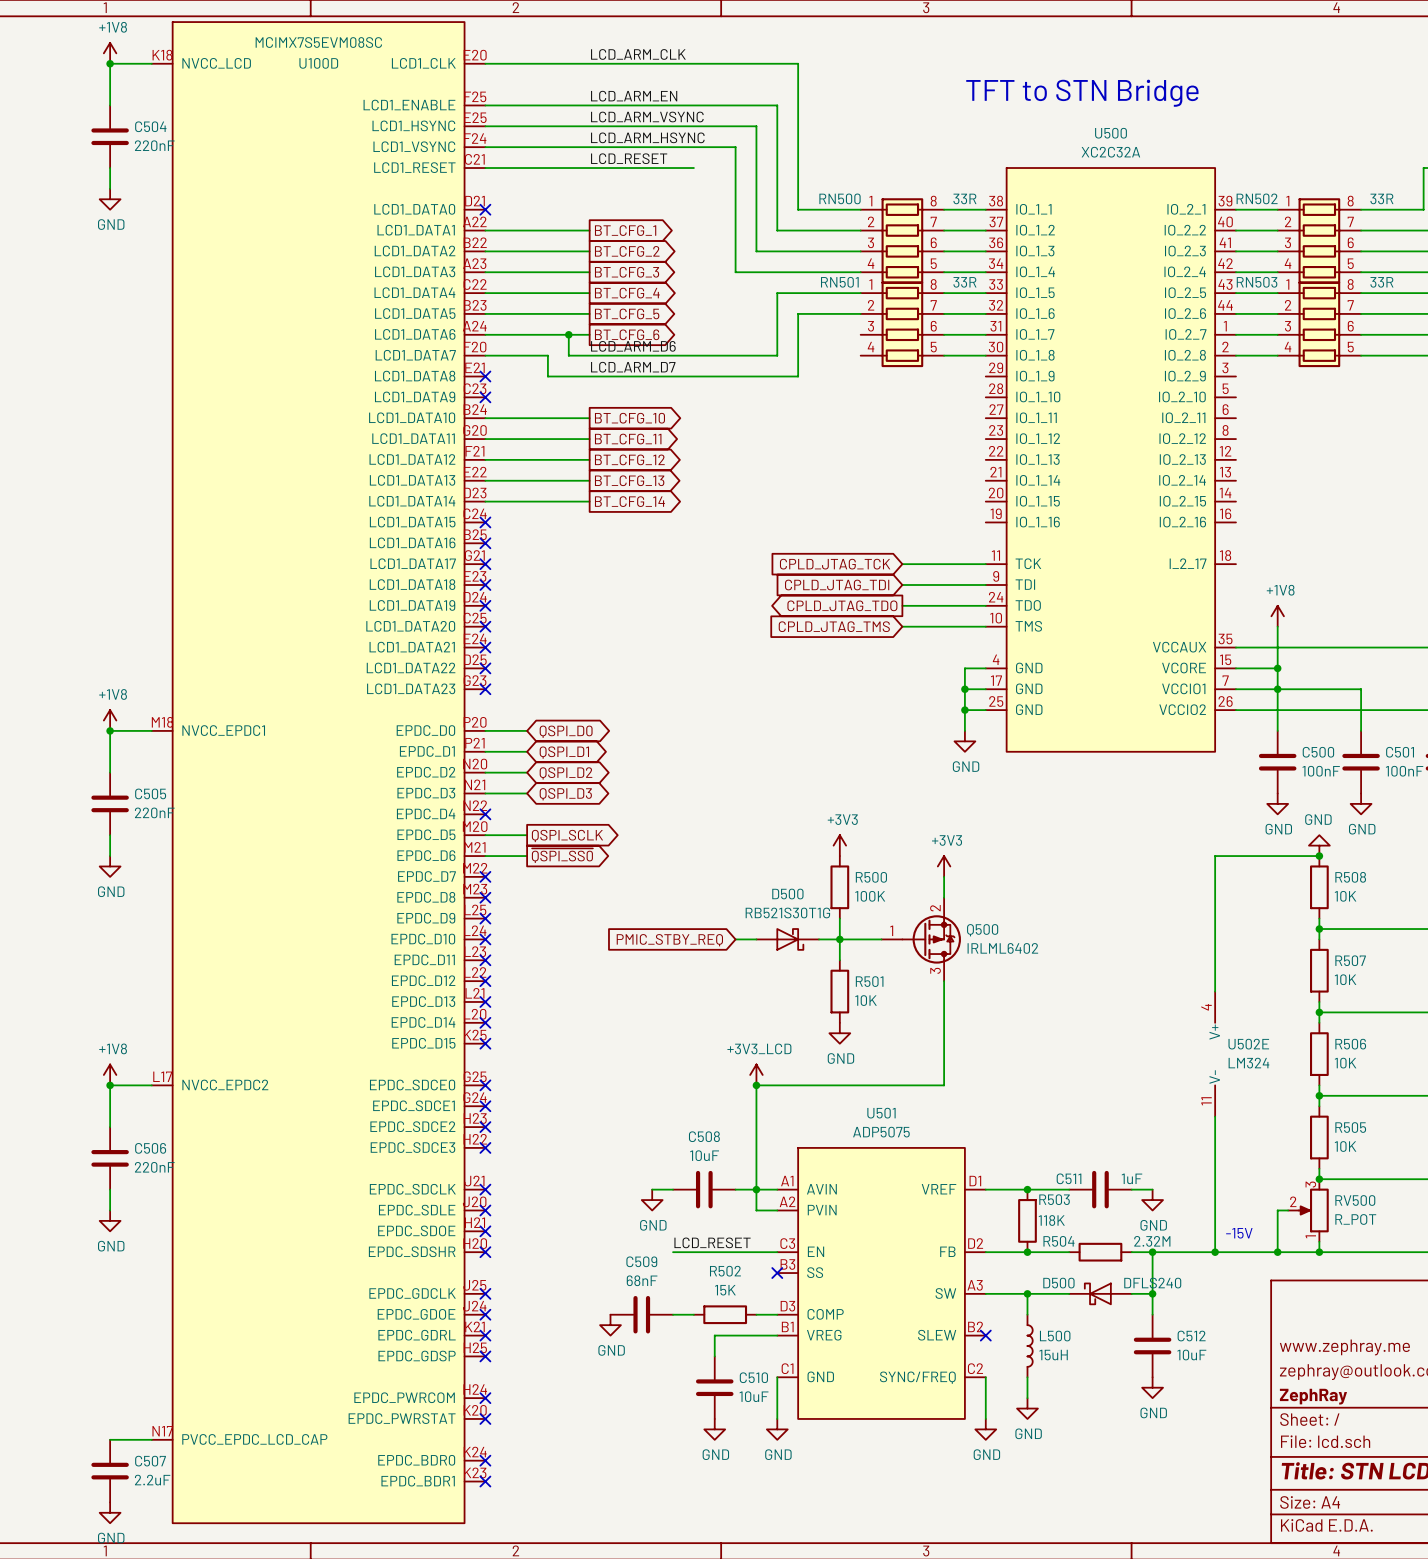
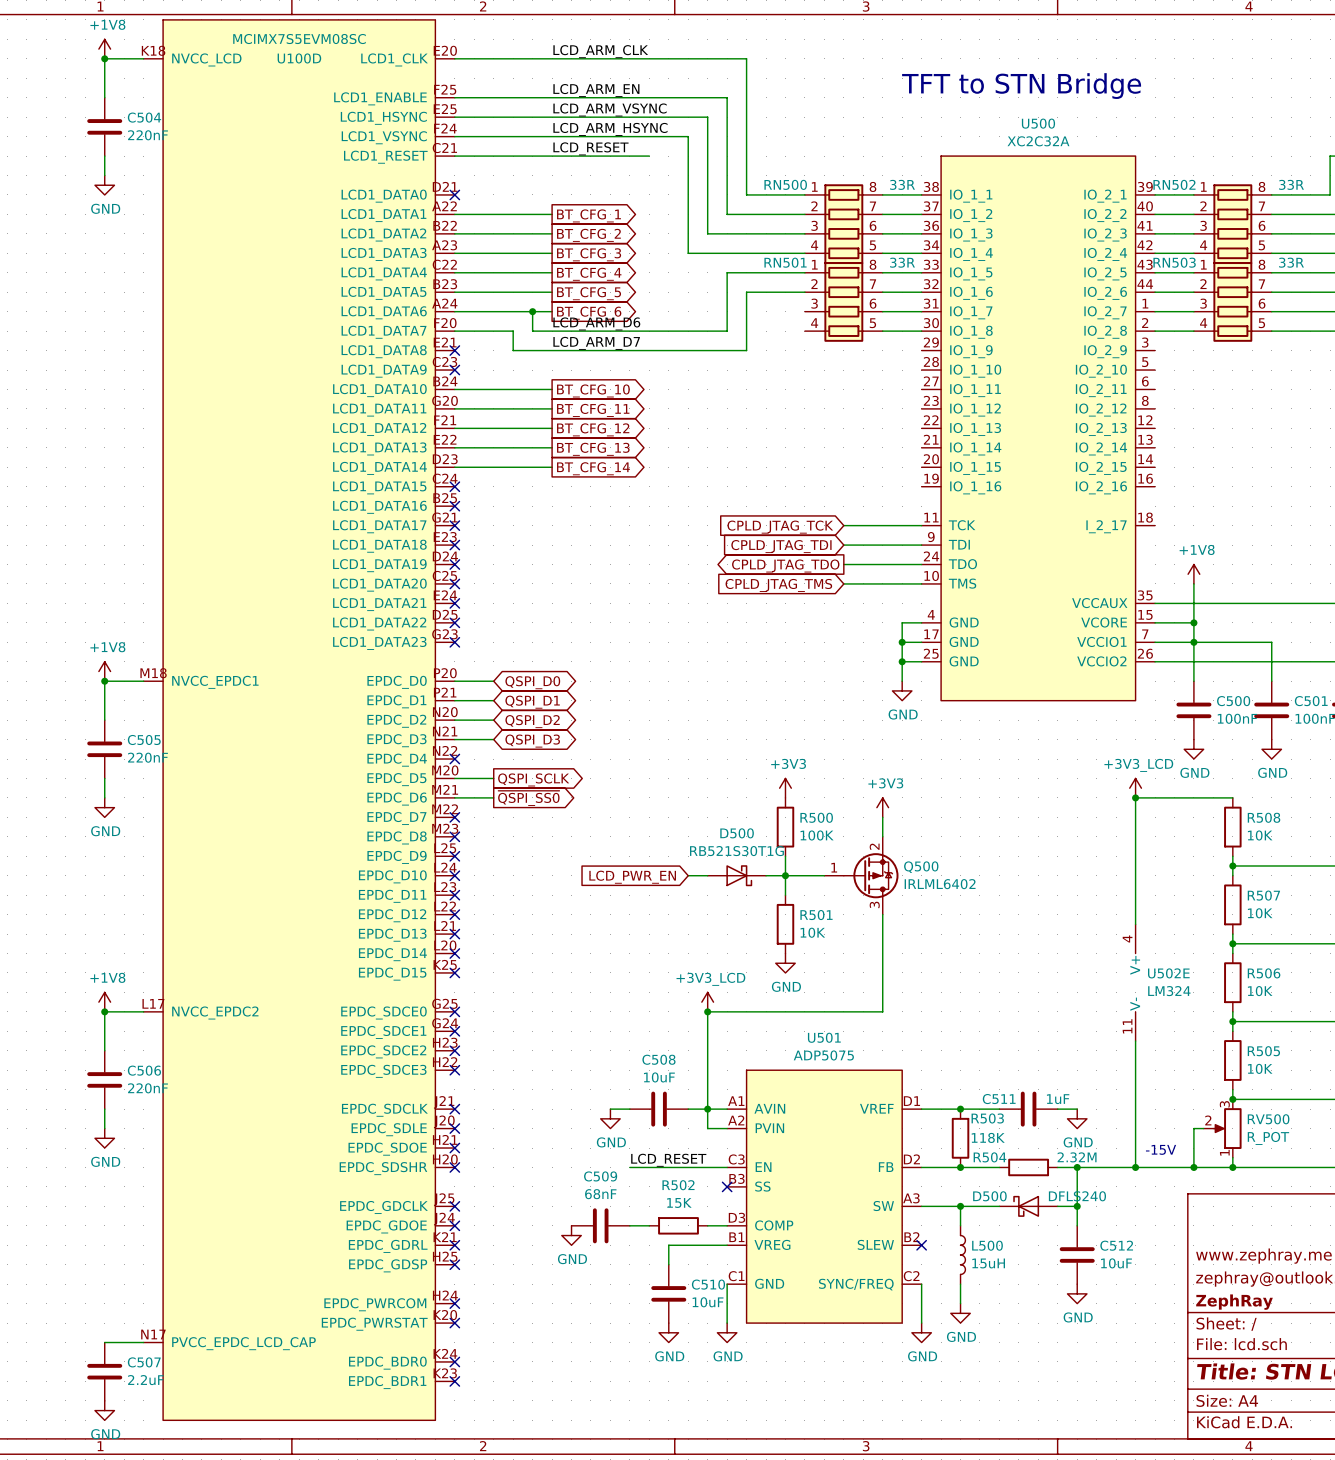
power symbol: none -> +3V3_LCD (1135, 788)
power symbol: GND (1319, 845) -> none
junction: none -> (1135, 797)
junction: (1319, 856) -> none
global label: PMIC_STBY_REQ (669, 940) -> LCD_PWR_EN (632, 877)

